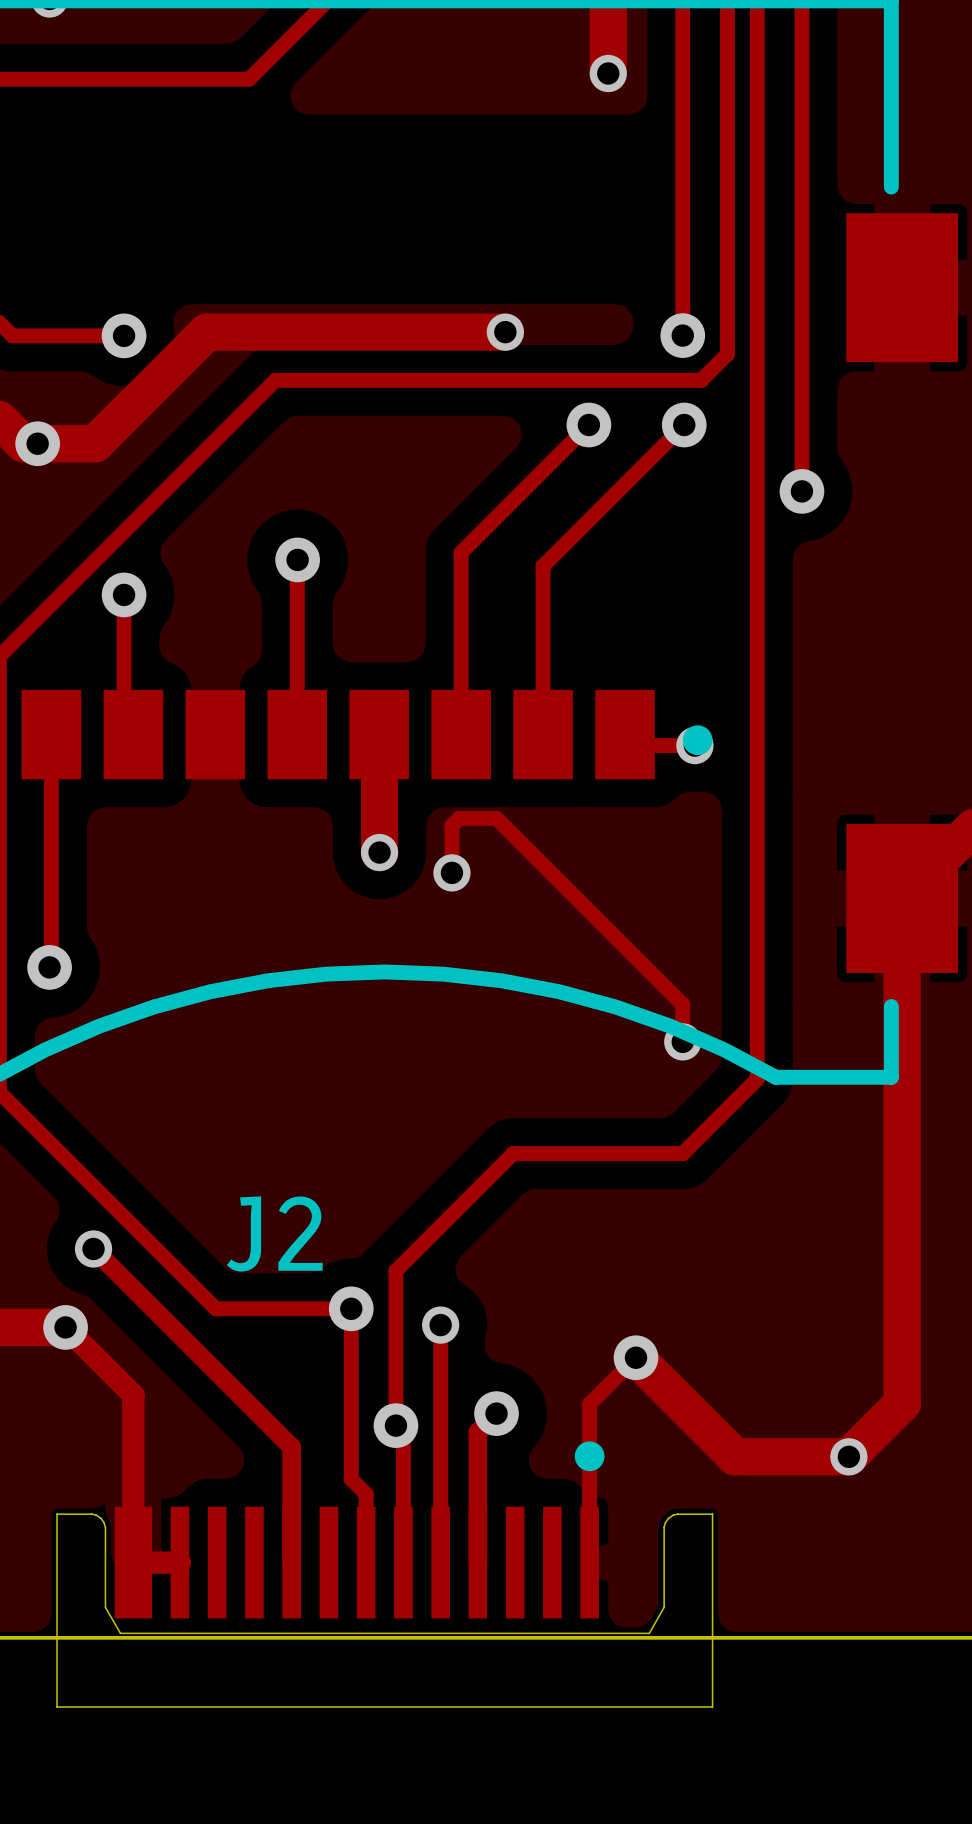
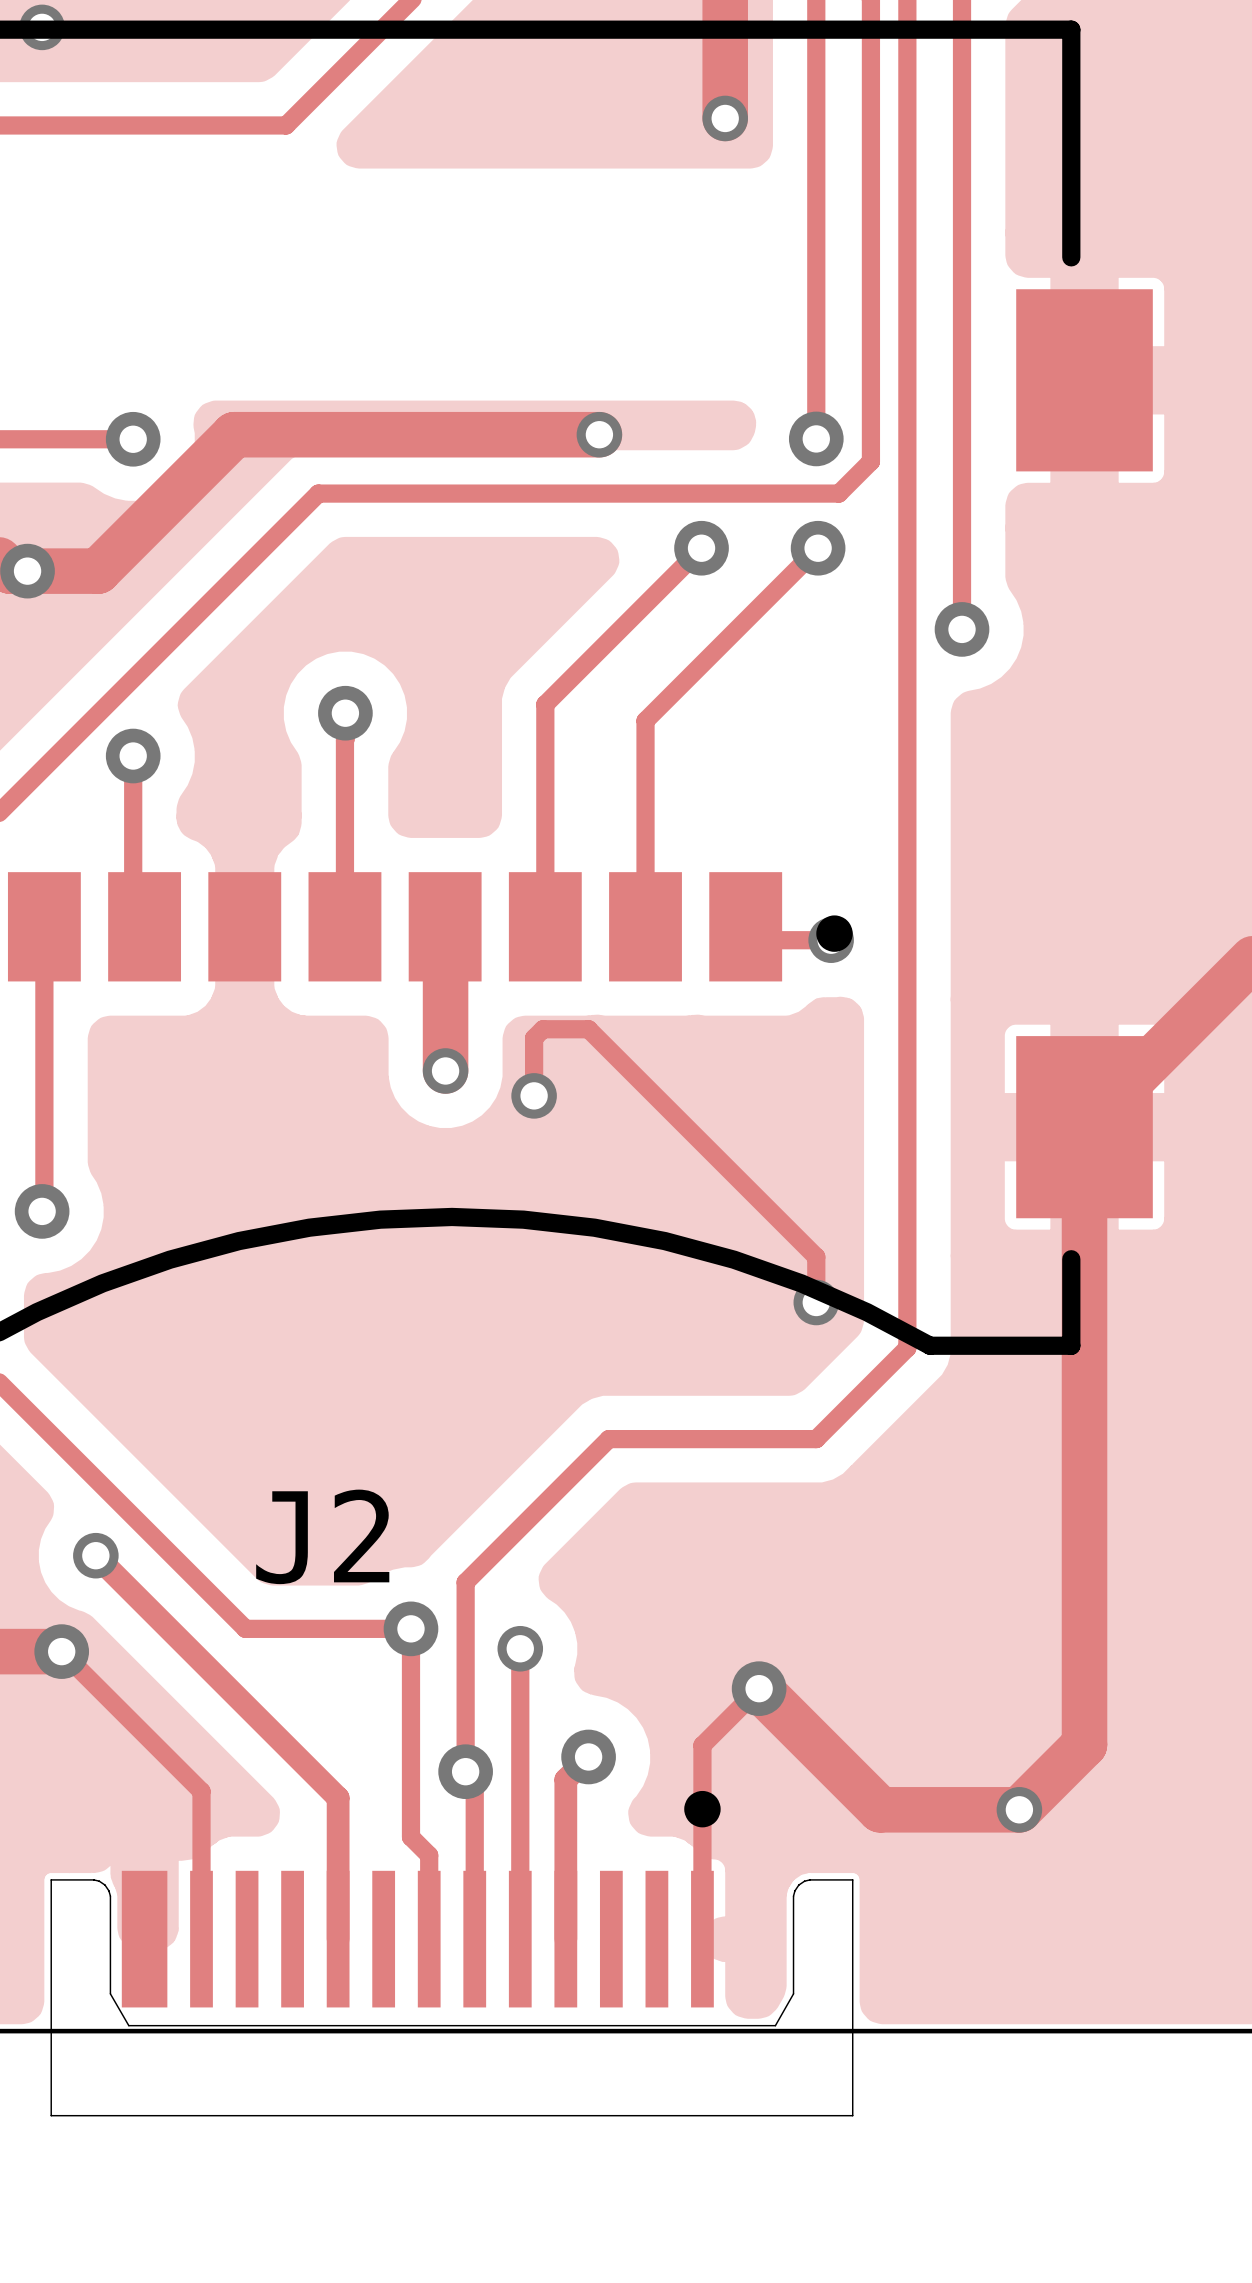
track width: thick (65, 1327) (133, 1395) -> thin (61, 1651) (144, 1734)
track: (133, 1395) (133, 1562) (179, 1562) -> (144, 1734) (201, 1791) (201, 1939)

